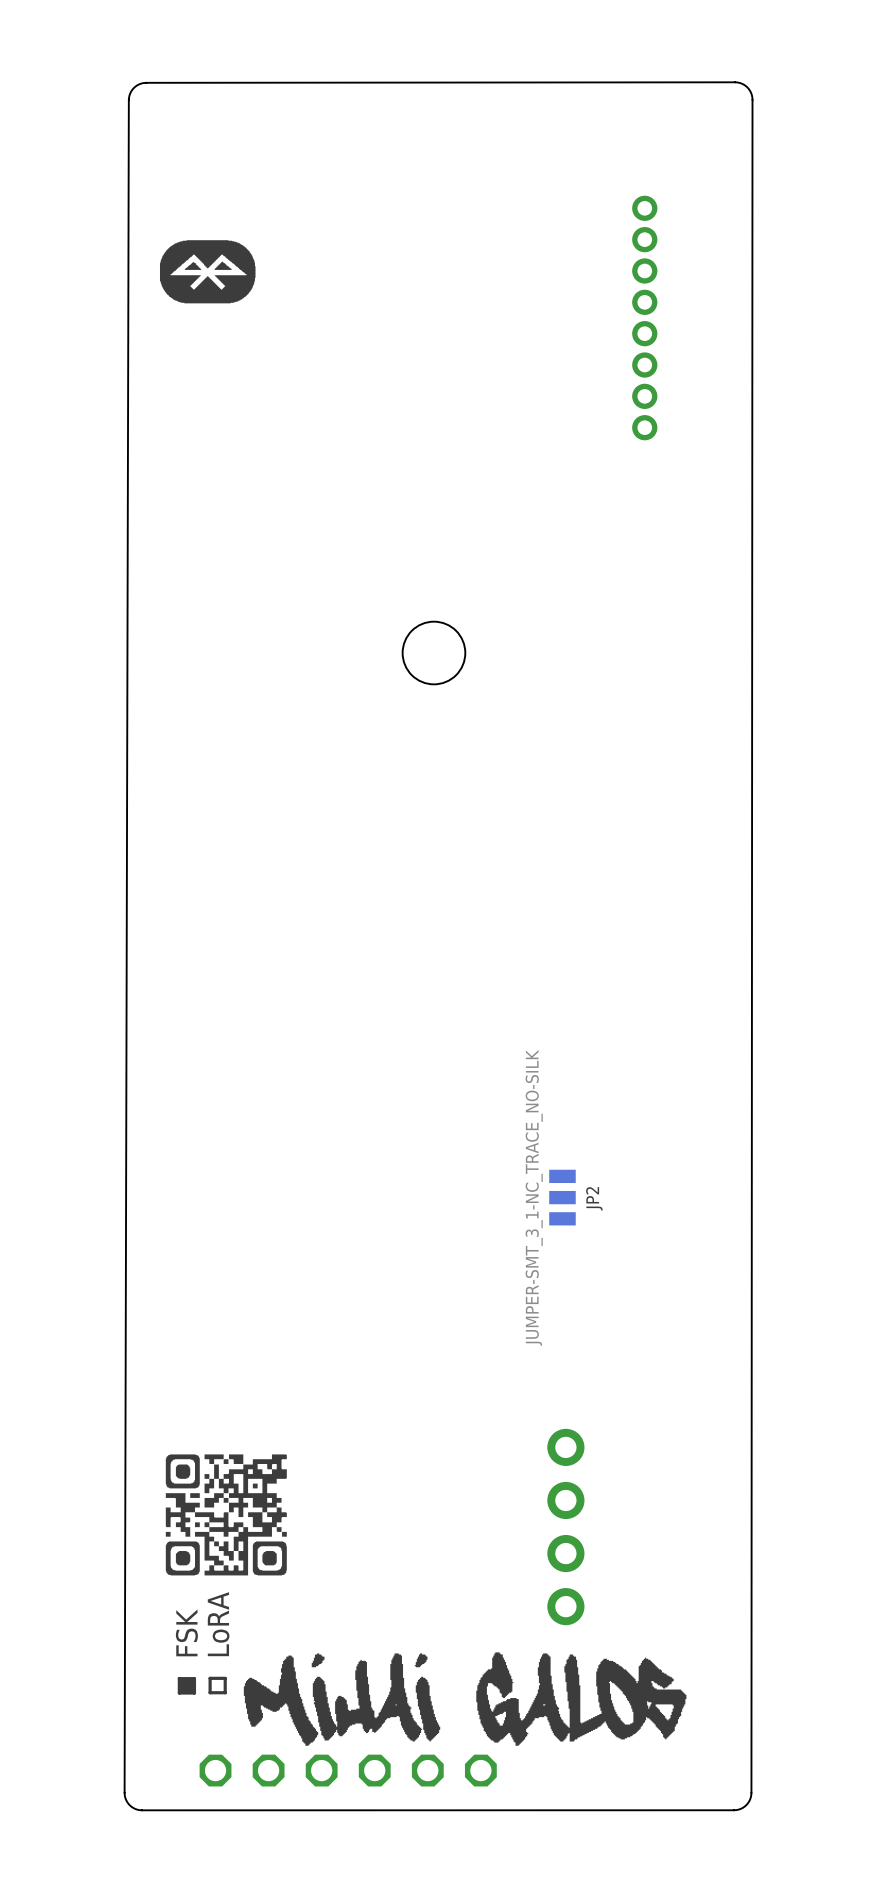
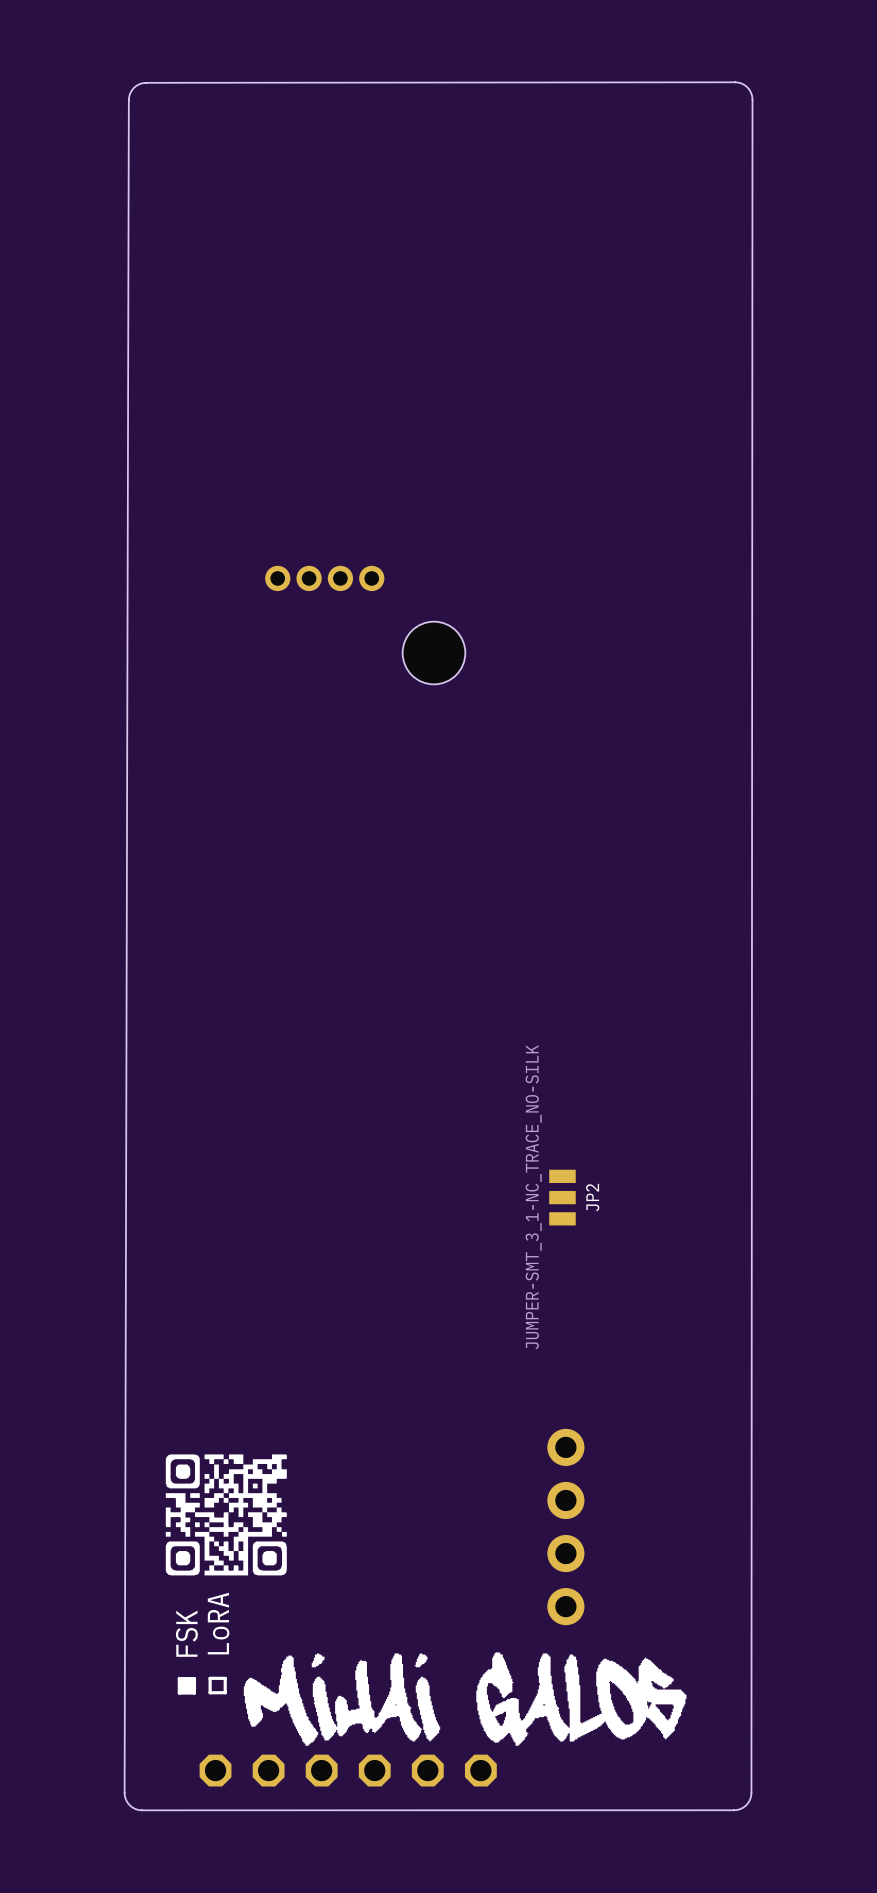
drawing: [159, 240, 256, 304] -> none
part: (644, 318) -> none
part: none -> (324, 578)

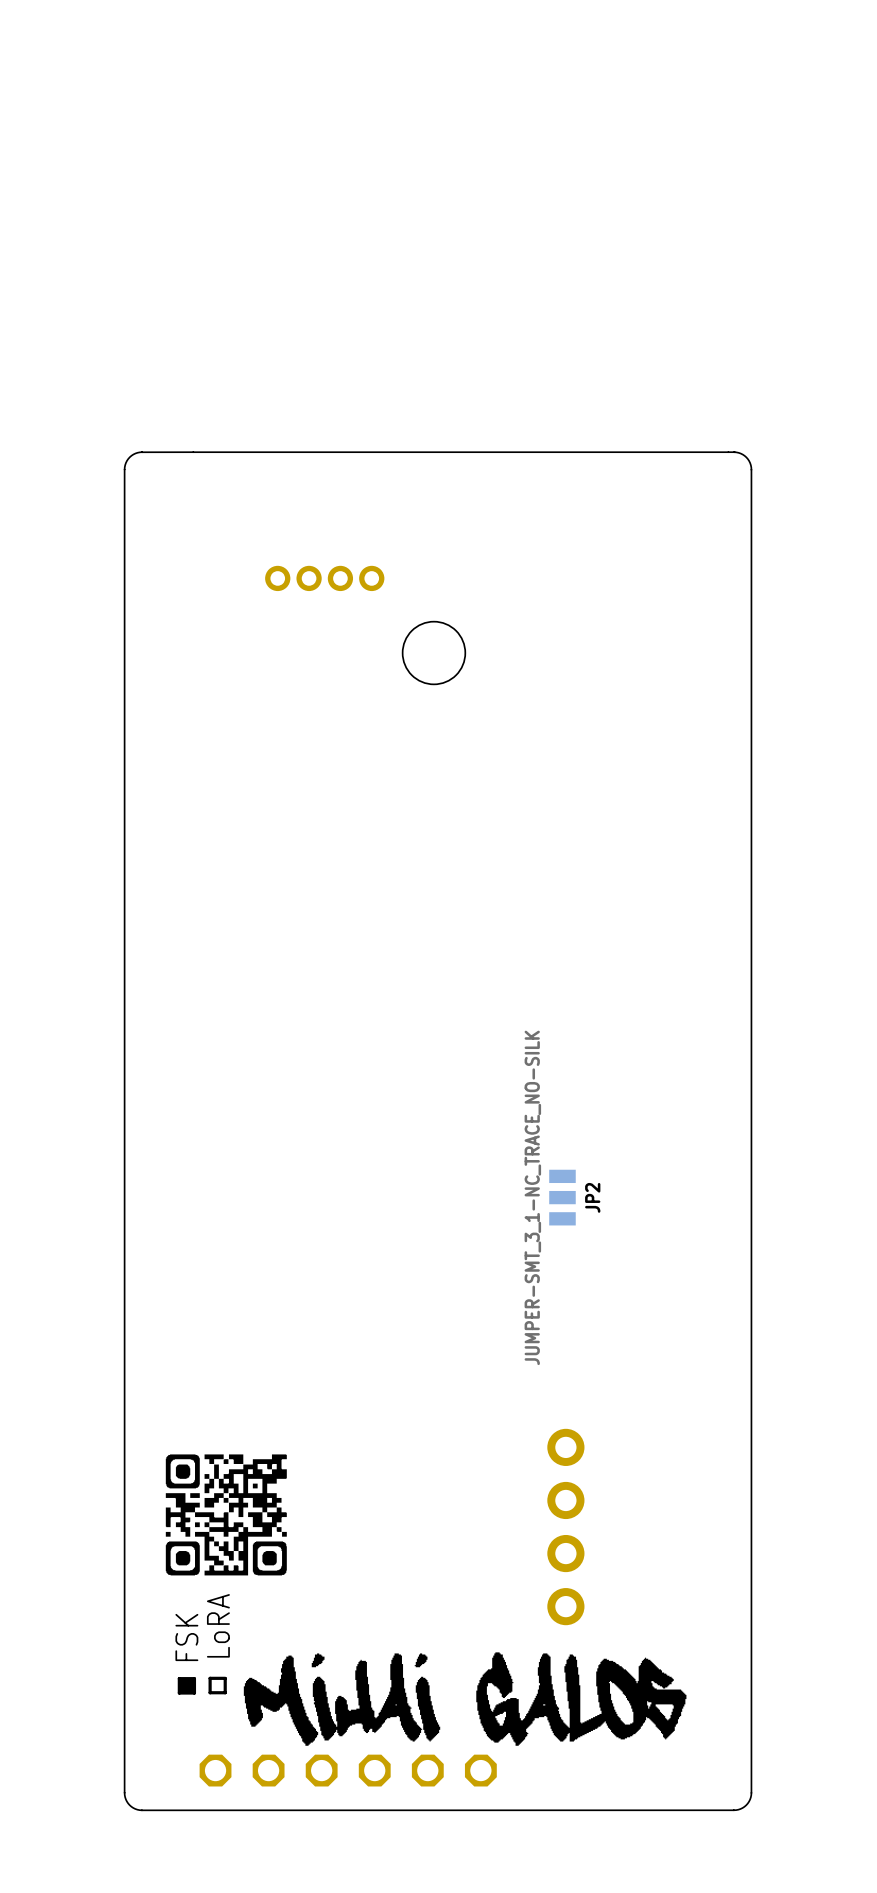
board edge: (146, 82) (134, 87) (128, 100) -> none
board edge: (735, 82) (747, 87) (752, 99) (751, 1792) -> (734, 452) (746, 457) (751, 469) (751, 1792)
board edge: (735, 82) (146, 82) -> none
board edge: (128, 99) (124, 1792) -> (734, 452) (142, 452) (133, 454) (125, 462) (124, 1792)

